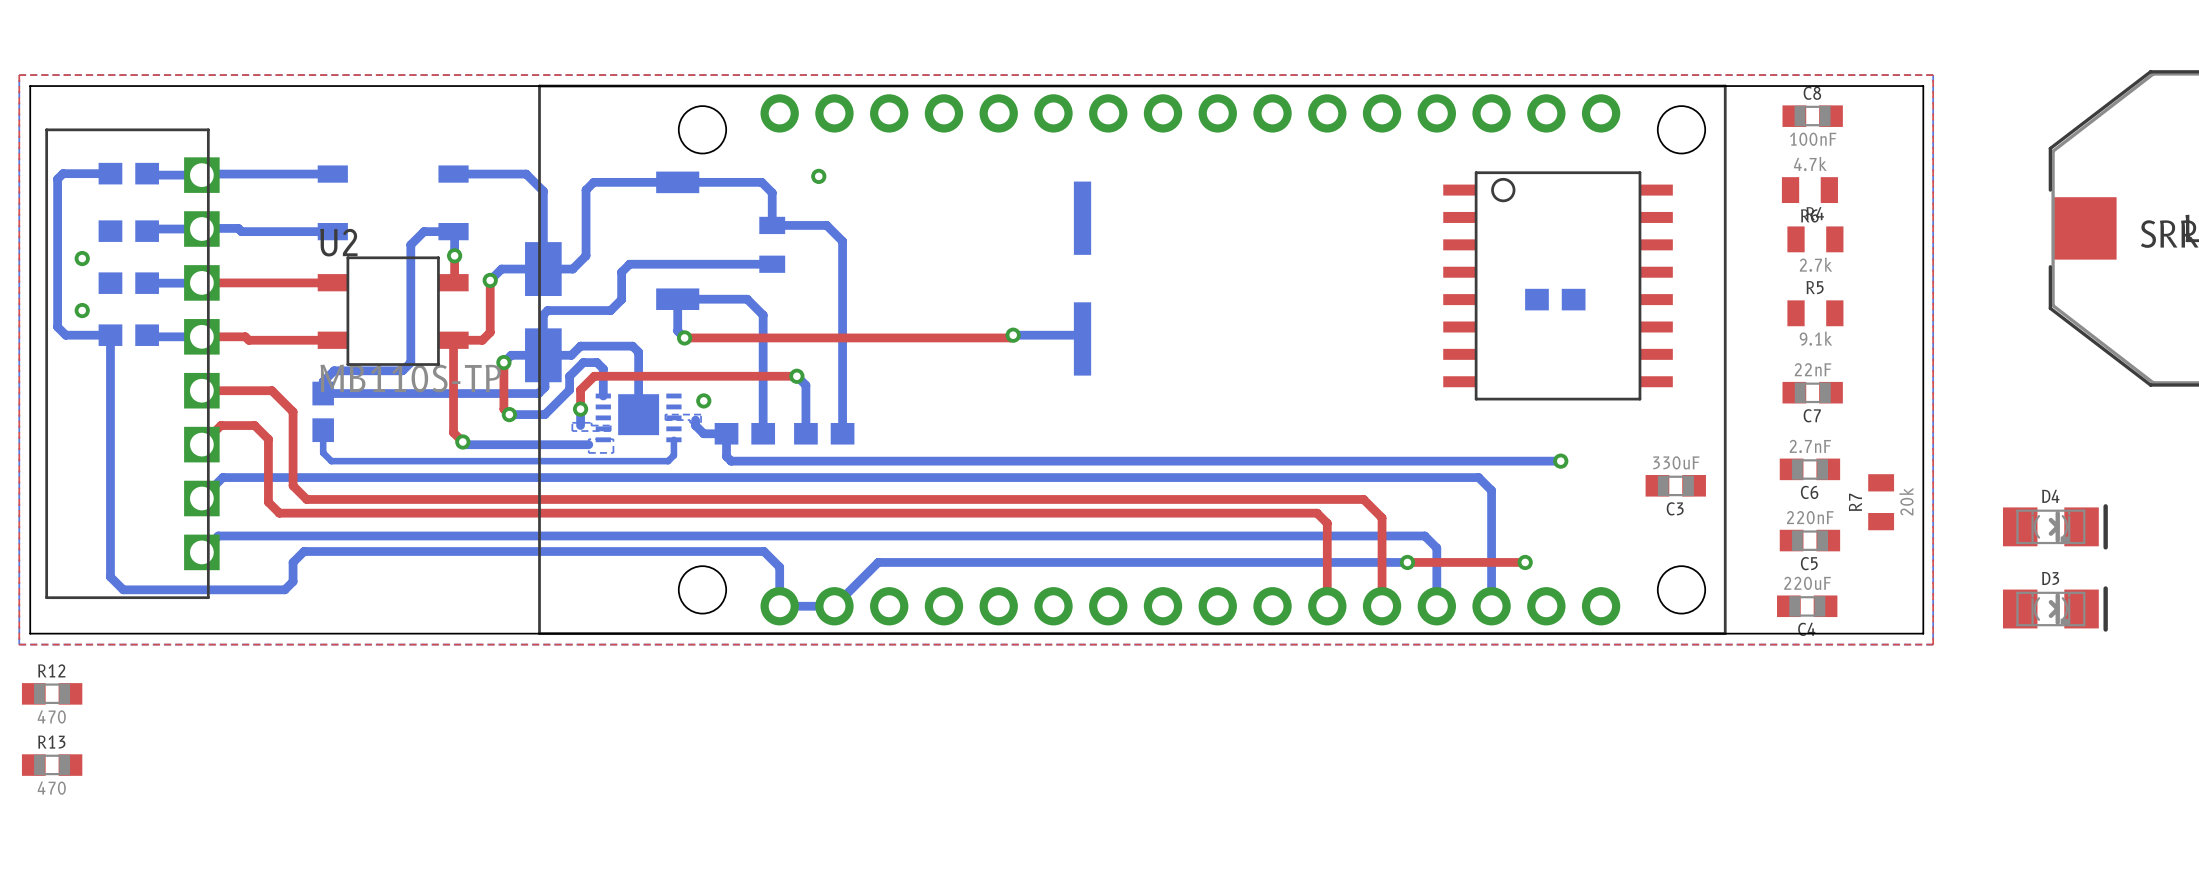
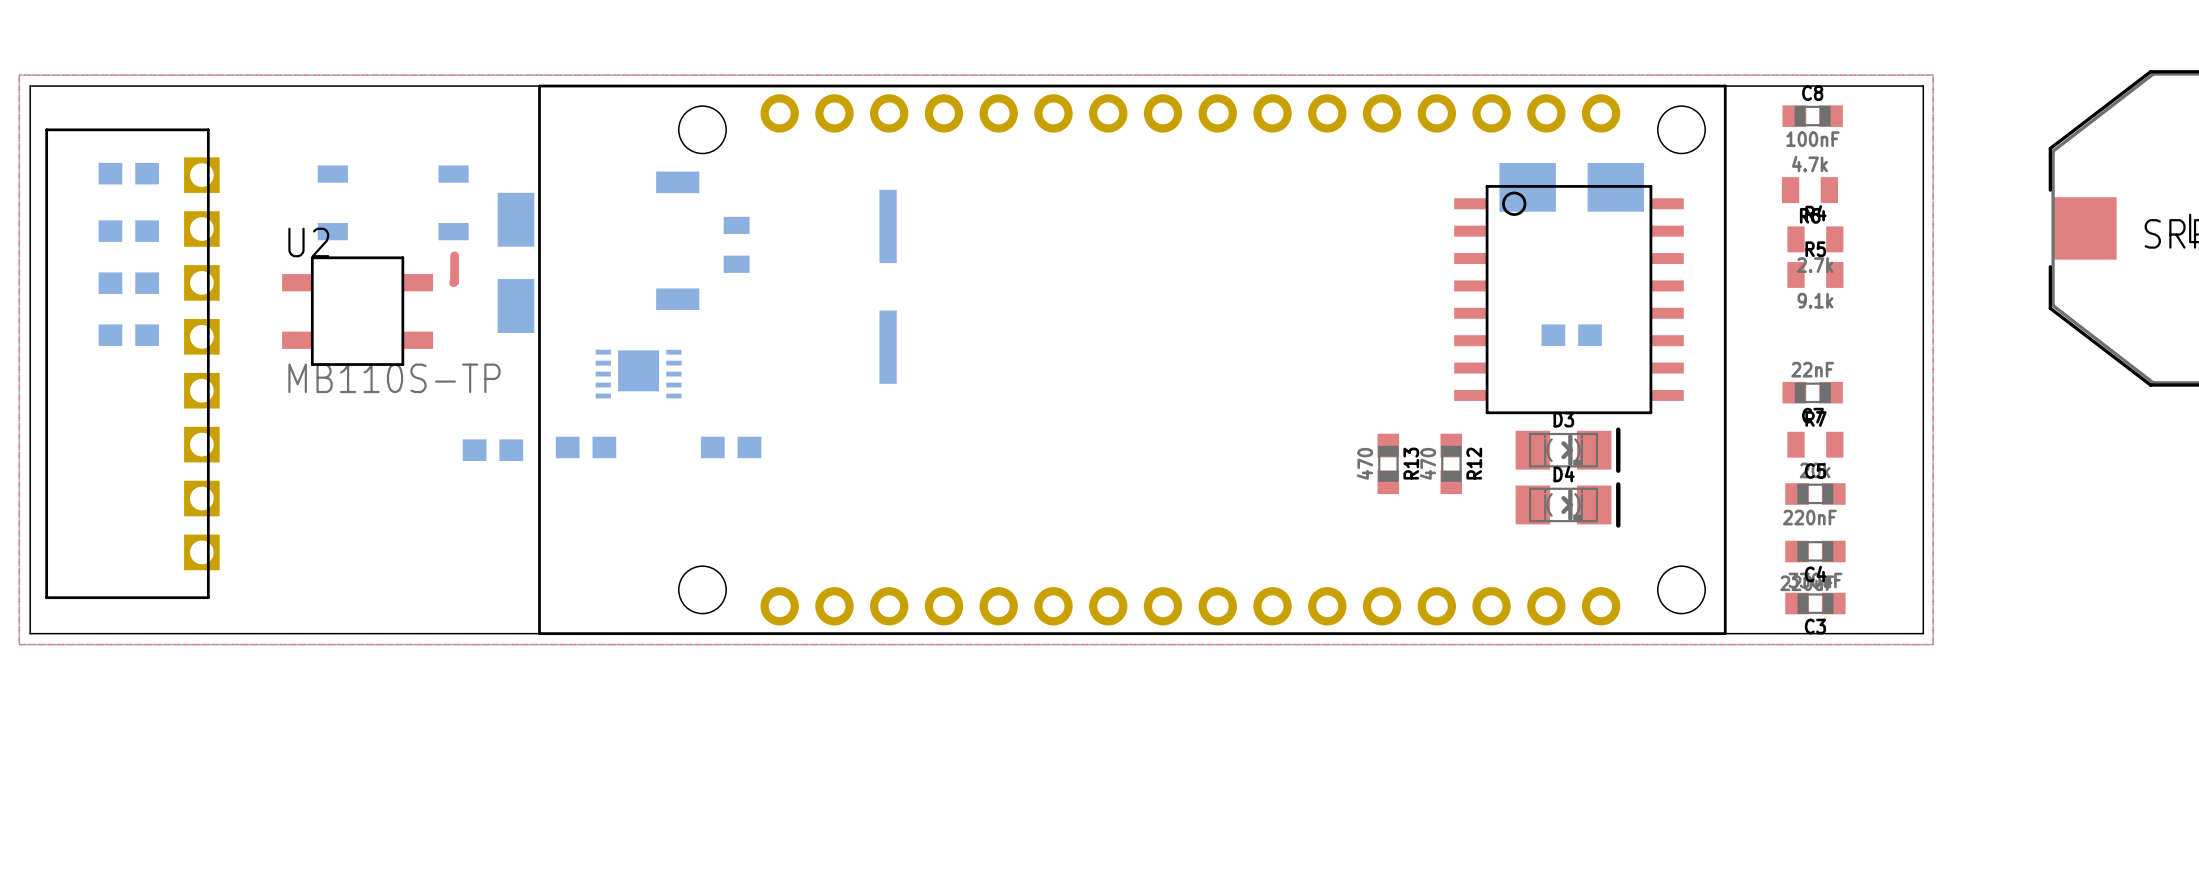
bottom track: (110, 173) (63, 173) (57, 179) (57, 326) (65, 335) (110, 335) (110, 576) (123, 589) (284, 589) (293, 581) (293, 562) (304, 551) (764, 551) (779, 567) (779, 606) (834, 606) (878, 562) (1407, 562) -> none
bottom track: (147, 173) (332, 174) -> none
bottom track: (453, 174) (526, 174) (543, 191) (543, 269) -> none
via: (818, 176) -> none
part: none -> (1571, 187)
bottom track: (147, 231) (149, 229) (238, 228) (241, 231) (332, 231) -> none
part position: (772, 244) -> (736, 244)
bottom track: (454, 255) (453, 231) (424, 231) (410, 244) (410, 362) (402, 370) (334, 370) (323, 381) (323, 393) (538, 393) (544, 387) (543, 314) (547, 310) (610, 310) (621, 299) (621, 272) (629, 264) (772, 264) -> none
via: (454, 255) -> none
via: (82, 258) -> none
part position: (1082, 278) -> (888, 286)
bottom track: (490, 280) (501, 269) (572, 269) (586, 255) (586, 190) (593, 182) (761, 182) (772, 192) (772, 225) (826, 225) (842, 241) (842, 433) -> none
top track: (490, 280) (490, 332) (482, 340) (453, 340) (453, 432) (462, 441) -> none
via: (490, 280) -> none
top track: (201, 282) (332, 282) -> none
bottom track: (147, 283) (201, 283) -> none
part position: (1558, 285) -> (1568, 299)
part position: (1555, 299) -> (1571, 335)
via: (82, 310) -> none
U2 position: (393, 311) -> (357, 311)
part position: (543, 312) -> (515, 262)
R5 position: (1815, 313) -> (1815, 274)
bottom track: (147, 335) (148, 336) (201, 336) -> none
bottom track: (1013, 335) (1078, 335) (1082, 338) -> none
top track: (1013, 335) (1010, 337) (684, 337) -> none
via: (1013, 335) -> none
top track: (201, 336) (245, 336) (248, 340) (332, 340) -> none
bottom track: (684, 337) (677, 331) (677, 299) (747, 299) (763, 315) (763, 433) -> none
via: (684, 337) -> none
bottom track: (503, 362) (511, 355) (571, 355) (580, 346) (632, 346) (638, 352) (638, 414) -> none
top track: (503, 362) (503, 409) (509, 414) -> none
via: (503, 362) -> none
bottom track: (796, 376) (805, 385) (805, 433) -> none
top track: (796, 376) (594, 376) (580, 389) (580, 409) -> none
via: (796, 376) -> none
top track: (201, 390) (271, 390) (293, 411) (293, 485) (306, 499) (1363, 499) (1382, 517) (1382, 606) -> none
bottom track: (603, 395) (603, 368) (596, 362) (583, 362) (569, 376) (569, 389) (544, 414) (509, 414) -> none
via: (703, 400) -> none
bottom track: (580, 409) (580, 425) -> none
via: (580, 409) -> none
part: (323, 411) -> none
via: (509, 414) -> none
bottom zone outline: (665, 414) (665, 420) (690, 420) (690, 422) (701, 422) (701, 414) (665, 414) -> none
part position: (638, 417) -> (638, 374)
bottom track: (695, 420) (695, 425) (703, 433) (726, 433) (726, 456) (731, 461) (1560, 461) -> none
bottom zone outline: (572, 422) (572, 431) (610, 431) (610, 425) (572, 422) -> none
bottom track: (323, 430) (323, 452) (331, 461) (668, 461) (673, 455) (673, 439) -> none
part position: (744, 433) -> (731, 447)
part: (824, 433) -> none
bottom zone outline: (588, 439) (588, 452) (613, 452) (613, 439) (588, 439) -> none
bottom track: (462, 441) (465, 444) (588, 444) -> none
via: (462, 441) -> none
top track: (201, 444) (220, 425) (254, 425) (268, 439) (268, 502) (279, 513) (1317, 513) (1327, 523) (1327, 606) -> none
part: none -> (586, 447)
part: none -> (492, 450)
via: (1560, 461) -> none
C6: 2.7nF (1809, 469) -> none
C3 position: (1675, 485) -> (1815, 603)
bottom track: (201, 498) (222, 477) (1478, 477) (1491, 490) (1491, 606) -> none
R7 rotation: 0° (1881, 502) -> 90° clockwise (1815, 444)
R7 position: (1881, 502) -> (1815, 444)
D4 position: (2055, 526) -> (1568, 504)
C5 position: (1809, 540) -> (1815, 494)
bottom track: (201, 552) (218, 535) (1424, 535) (1436, 548) (1436, 606) -> none
top track: (1407, 562) (1525, 562) -> none
via: (1407, 562) -> none
via: (1525, 562) -> none
C5 name position: C5 (1809, 563) -> C5 (1815, 471)
C4 position: (1807, 606) -> (1815, 551)
D3 position: (2055, 609) -> (1568, 450)
R12 rotation: 0° (52, 693) -> 90° clockwise (1451, 463)
R12 position: (52, 693) -> (1451, 463)
R13 rotation: 0° (52, 765) -> 90° clockwise (1388, 463)
R13 position: (52, 765) -> (1388, 463)

